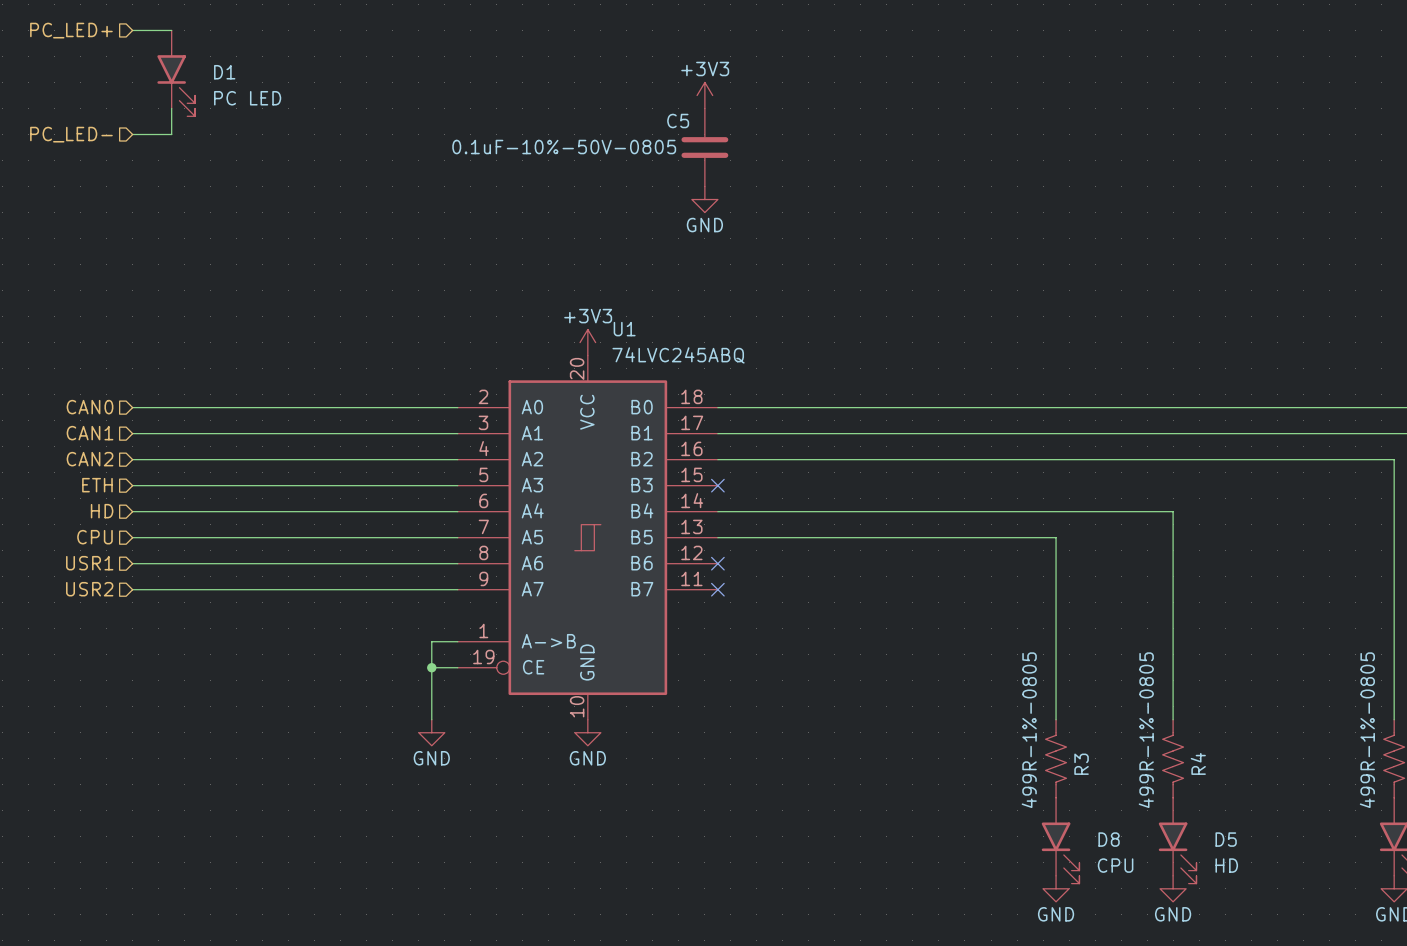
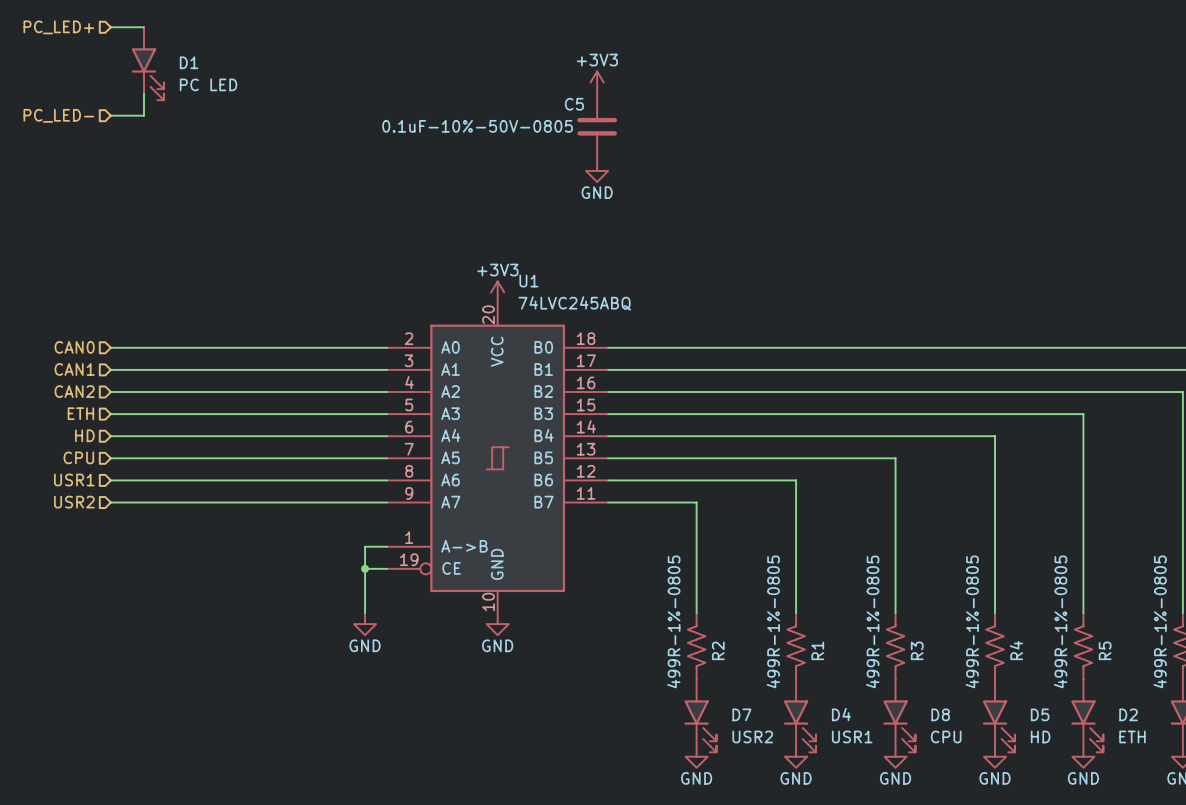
wire: none -> (608, 414) (1083, 414) (1083, 613)
no-connect mark: (717, 485) -> none
wire: none -> (608, 480) (796, 480) (796, 613)
no-connect mark: (717, 563) -> none
wire: none -> (608, 502) (696, 502) (696, 613)
no-connect mark: (717, 589) -> none
R2: none -> 499R-1%-0805 (696, 646)
R1: none -> 499R-1%-0805 (796, 646)
R5: none -> 499R-1%-0805 (1083, 646)
D7: none -> USR2 (700, 715)
D4: none -> USR1 (799, 715)
D2: none -> ETH (1087, 715)
power symbol: none -> GND (696, 756)
power symbol: none -> GND (796, 756)
power symbol: none -> GND (1083, 756)

